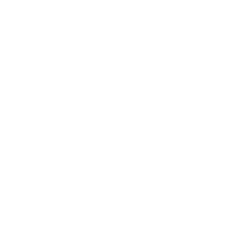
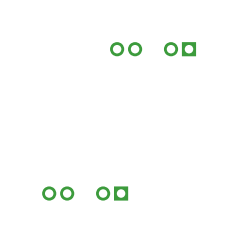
part: none -> (153, 49)
part: none -> (85, 193)

